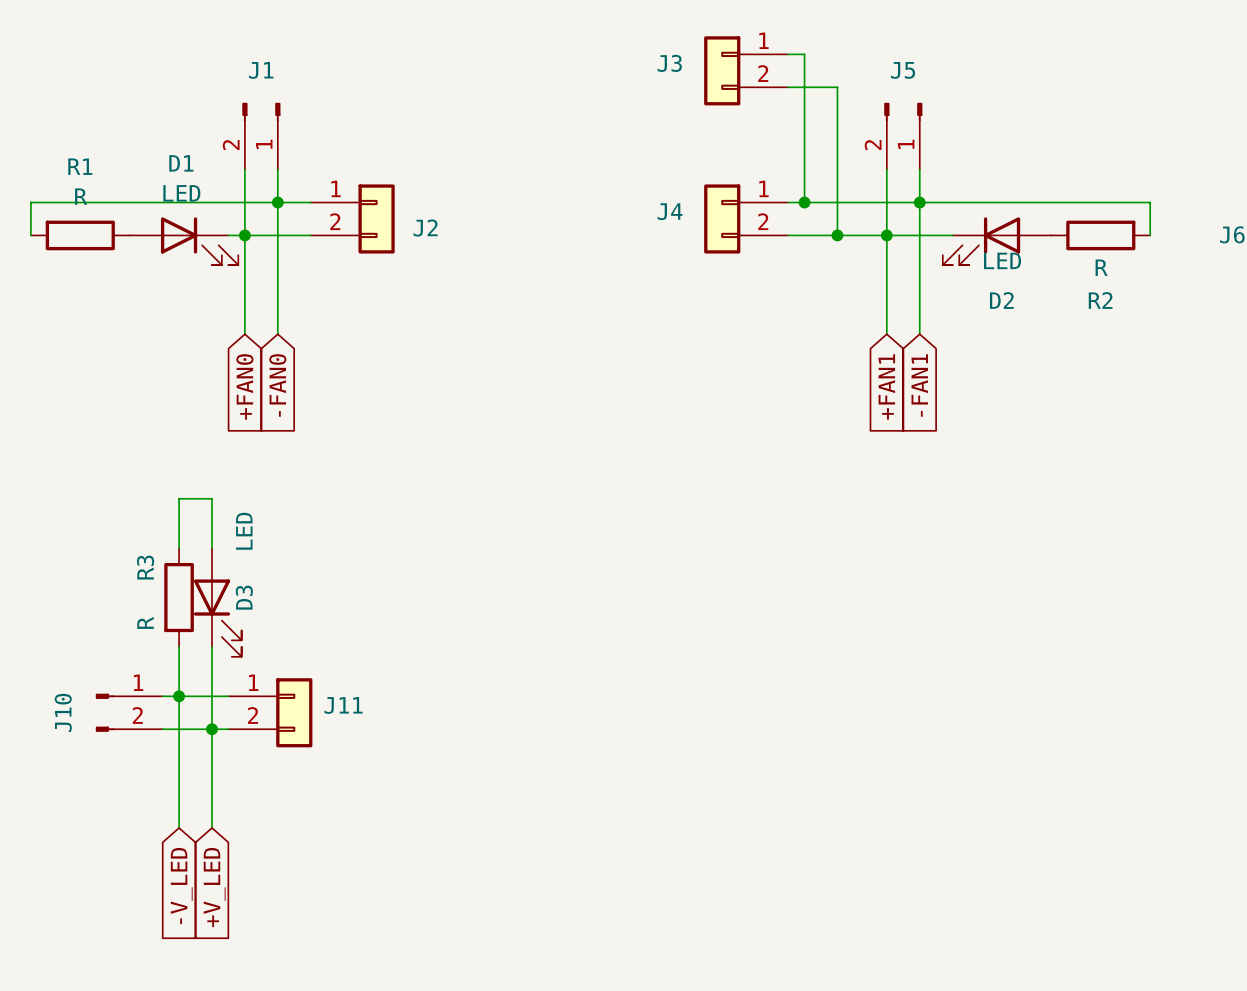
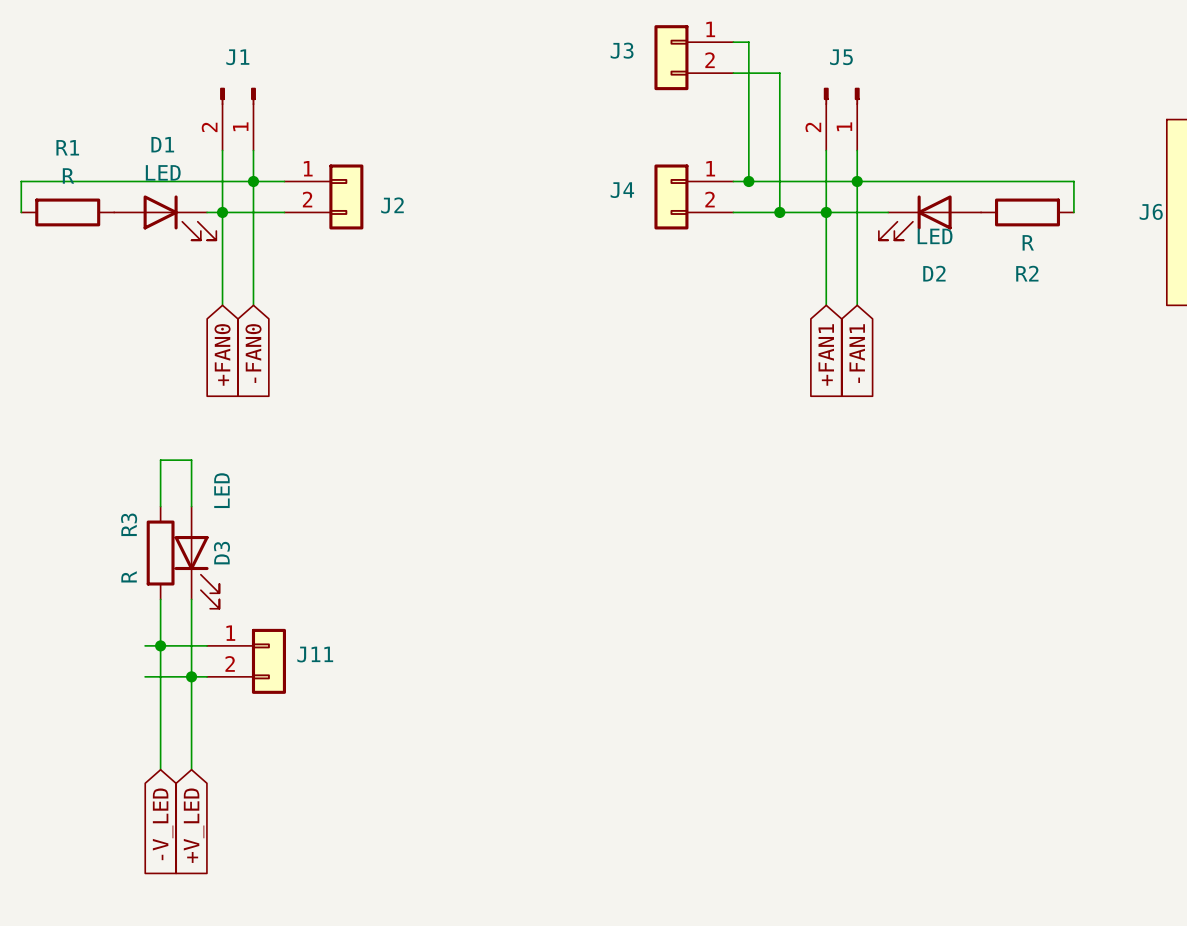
J10: (129, 712) -> none

